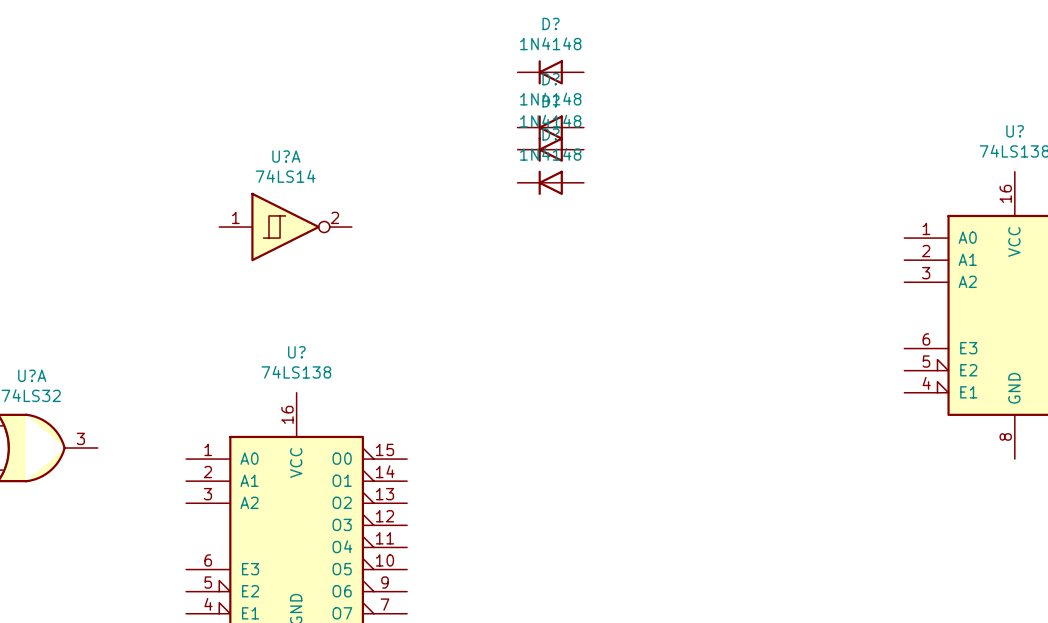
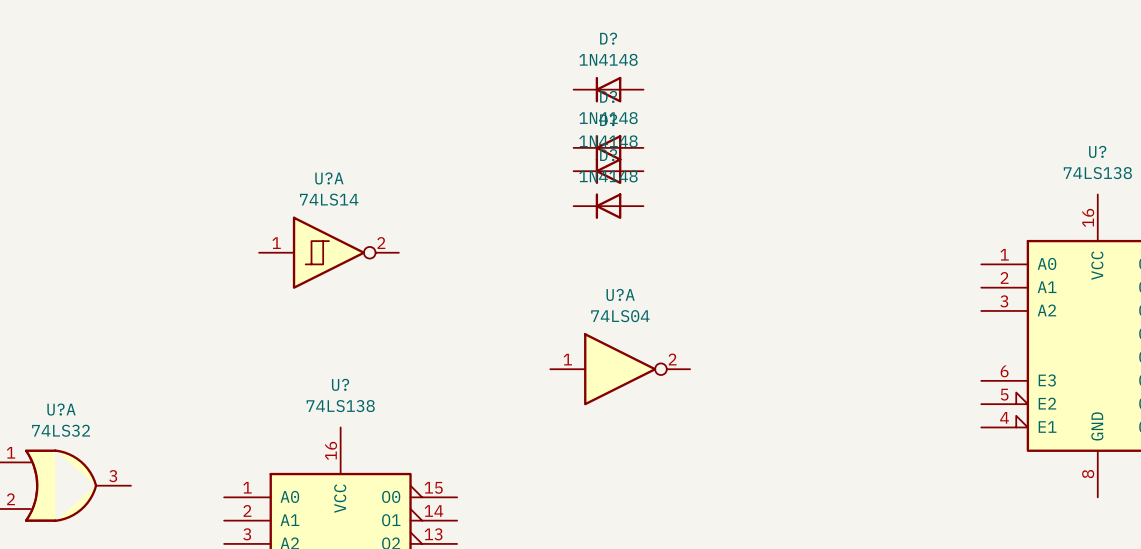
U?A: none -> 74LS04 (620, 369)

